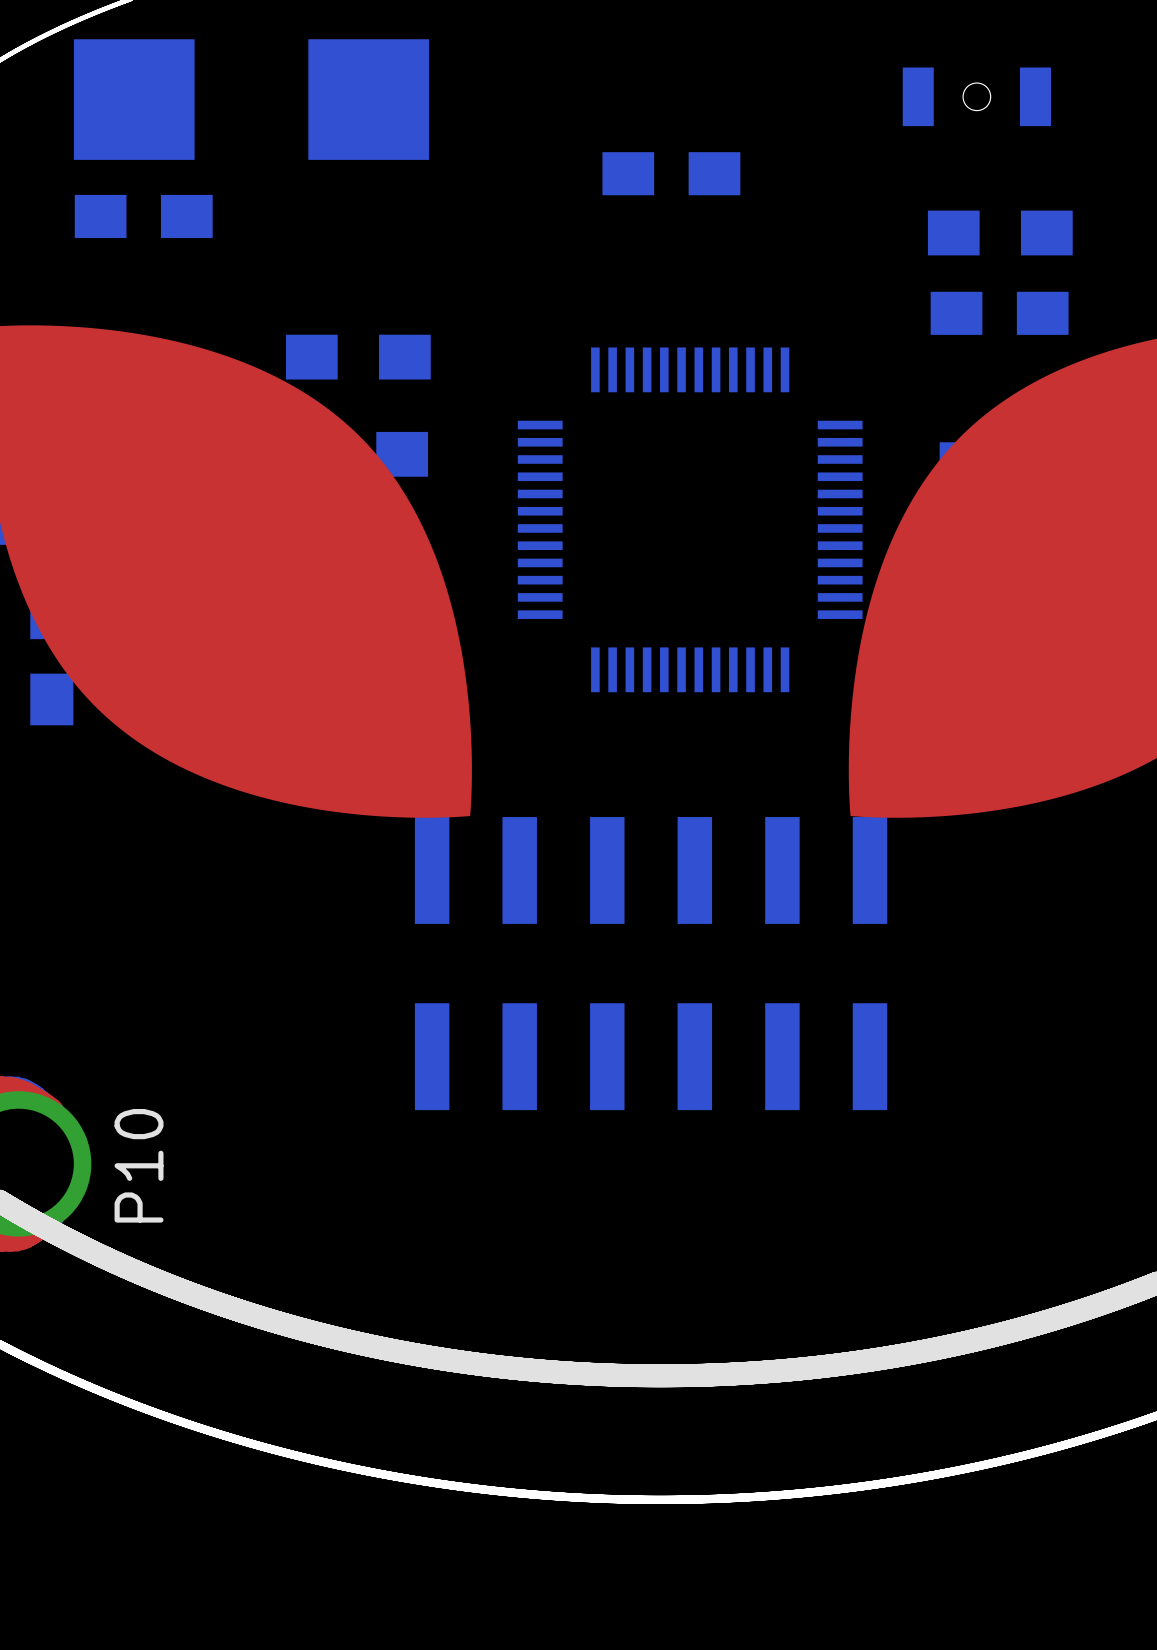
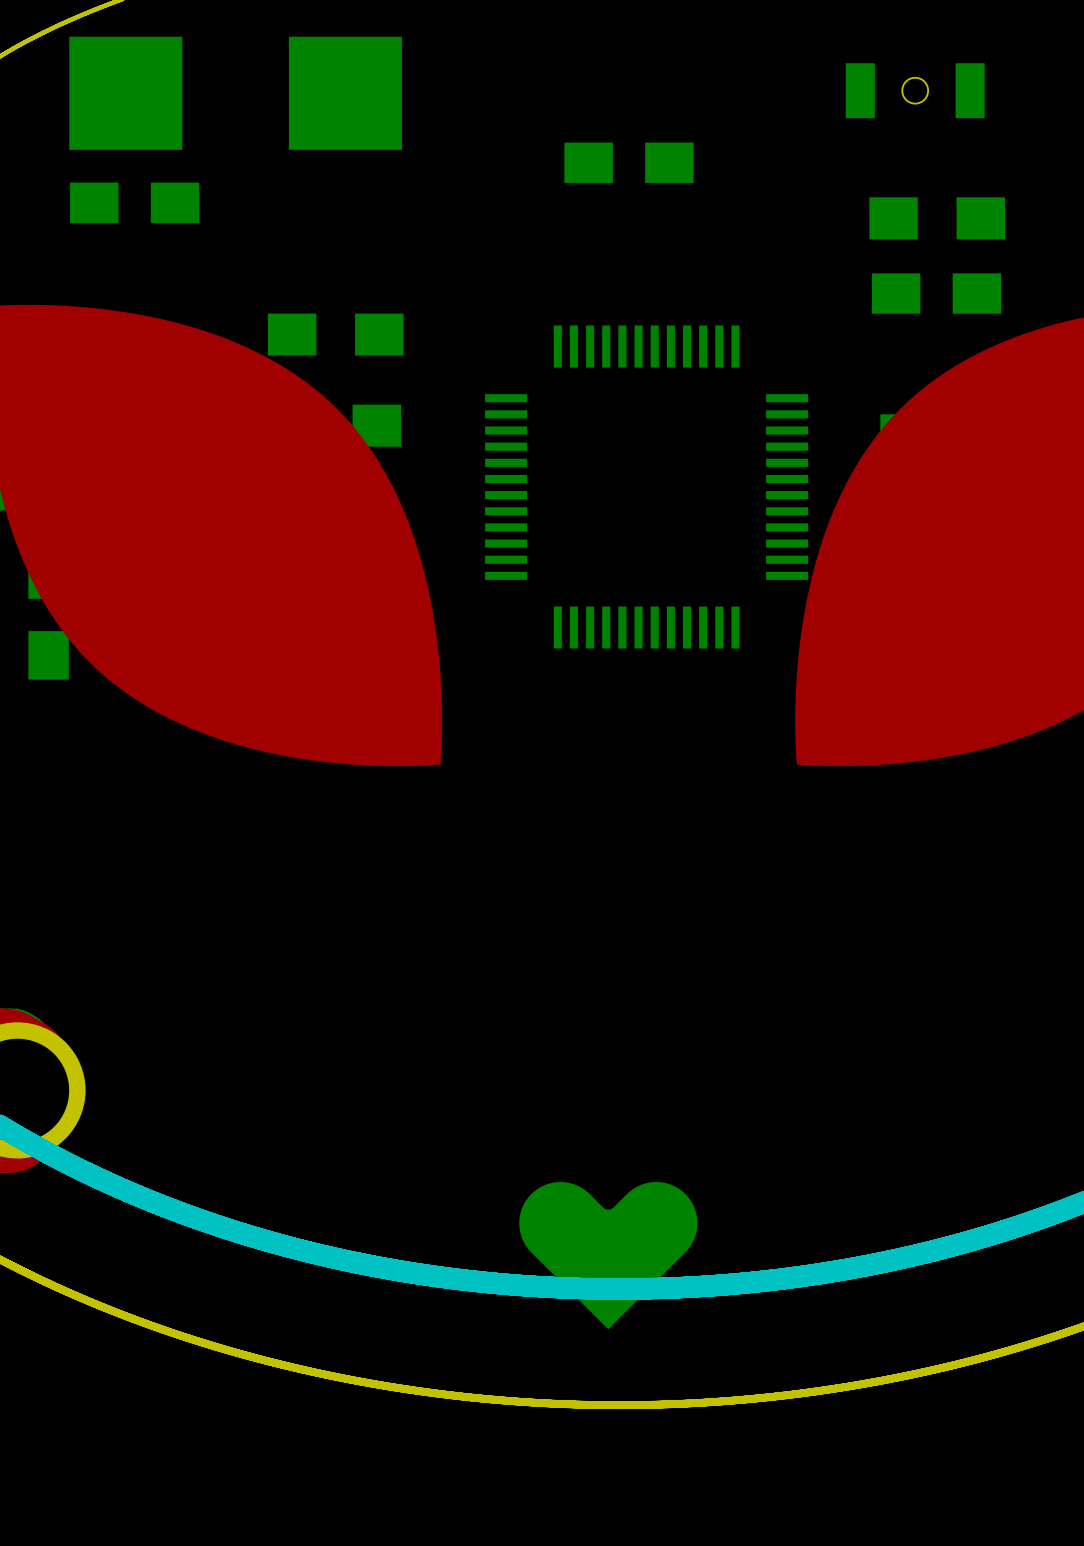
part: (651, 963) -> none
P10 name: P10 (139, 1165) -> none
drawing: none -> [519, 1182, 698, 1330]

